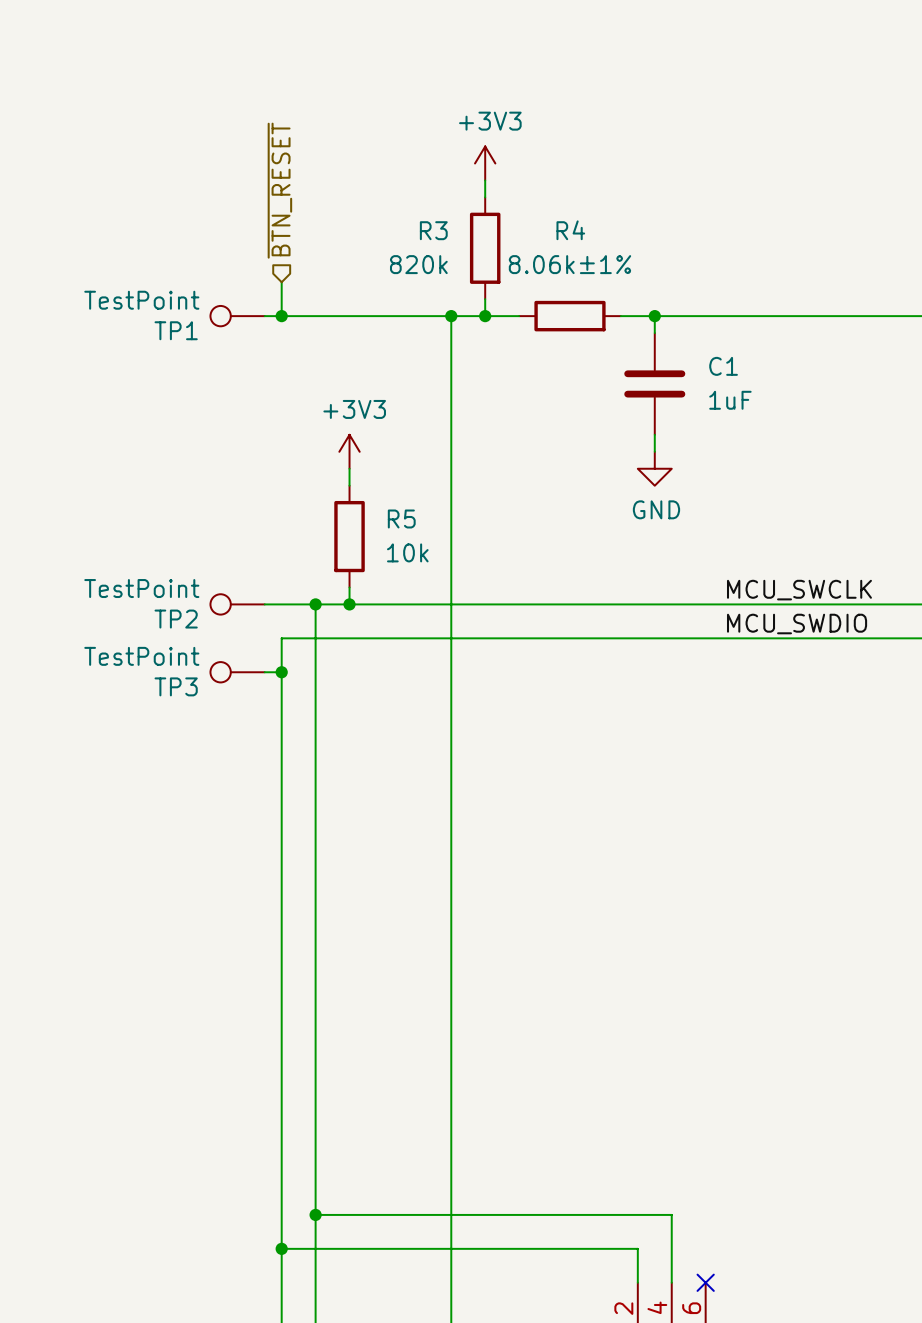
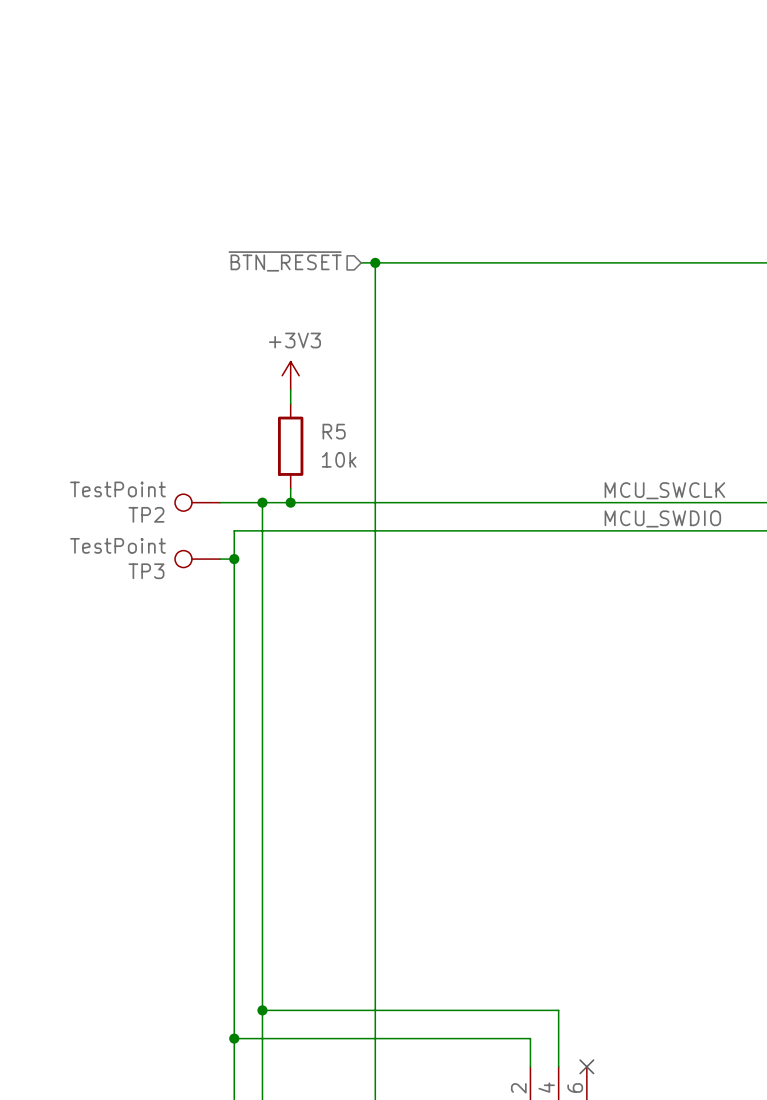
power symbol: +3V3 (485, 163) -> none
wire: (485, 180) (485, 197) -> none
hierarchical label rotation: 0° (279, 190) -> 90° counterclockwise (285, 261)
R3: 820k (485, 248) -> none
wire: (281, 282) (281, 316) -> none
wire: (485, 299) (485, 316) -> none
TP1: TestPoint (237, 316) -> none
wire: (264, 316) (434, 316) -> none
junction: (281, 316) -> none
junction: (485, 316) -> none
wire: none -> (431, 262) (516, 262)
R4: 8.06k±1% (569, 316) -> none
wire: (654, 316) (654, 333) -> none
junction: (654, 316) -> none
C1: 1uF (654, 383) -> none
wire: (654, 434) (654, 451) -> none
power symbol: GND (654, 468) -> none

